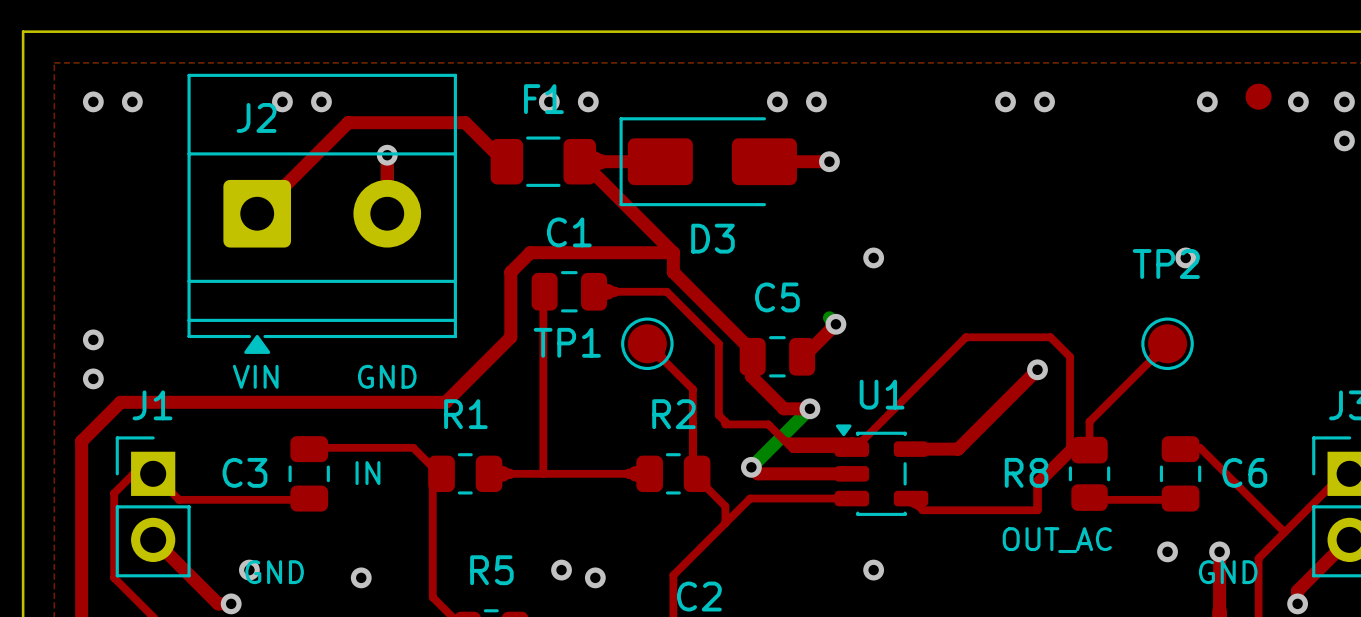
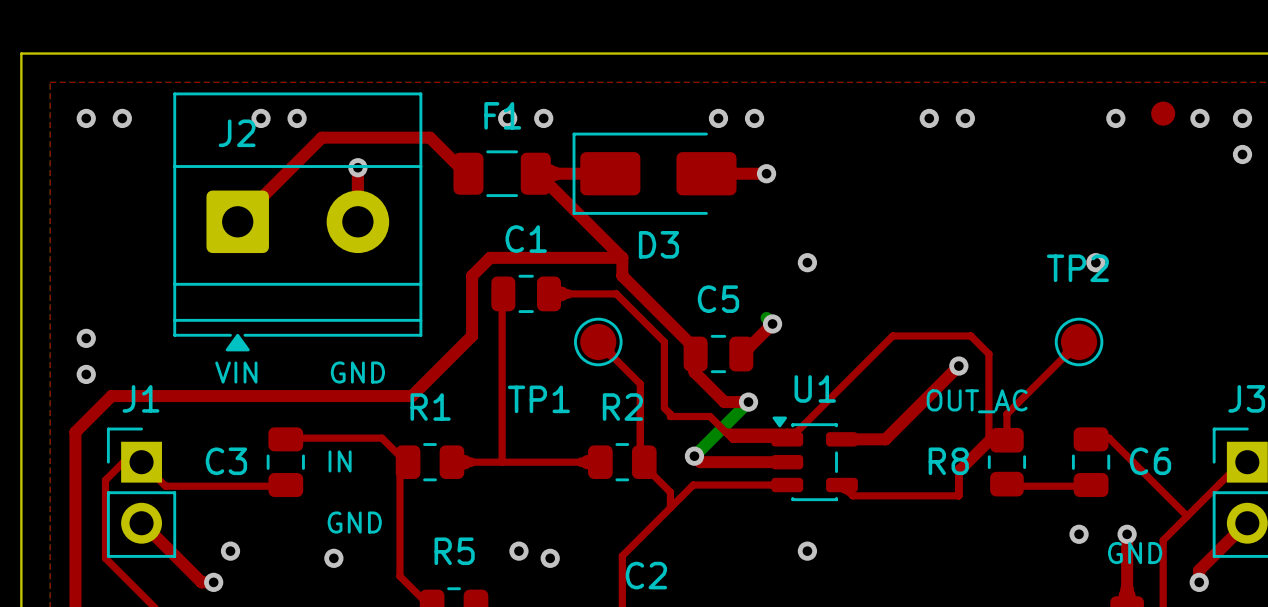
TP1 name position: TP1 (567, 342) -> TP1 (538, 399)
text position: OUT_AC (1057, 540) -> OUT_AC (977, 401)
text position: GND (274, 572) -> GND (354, 522)

